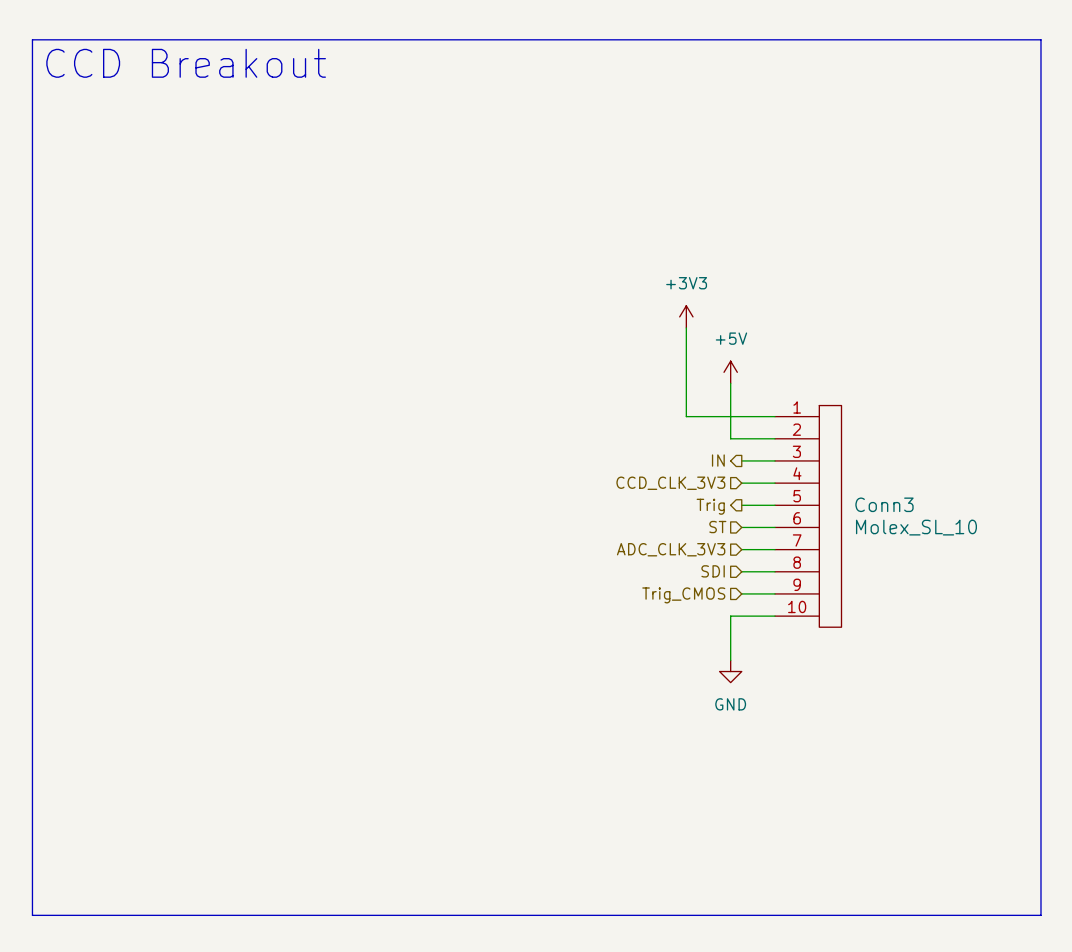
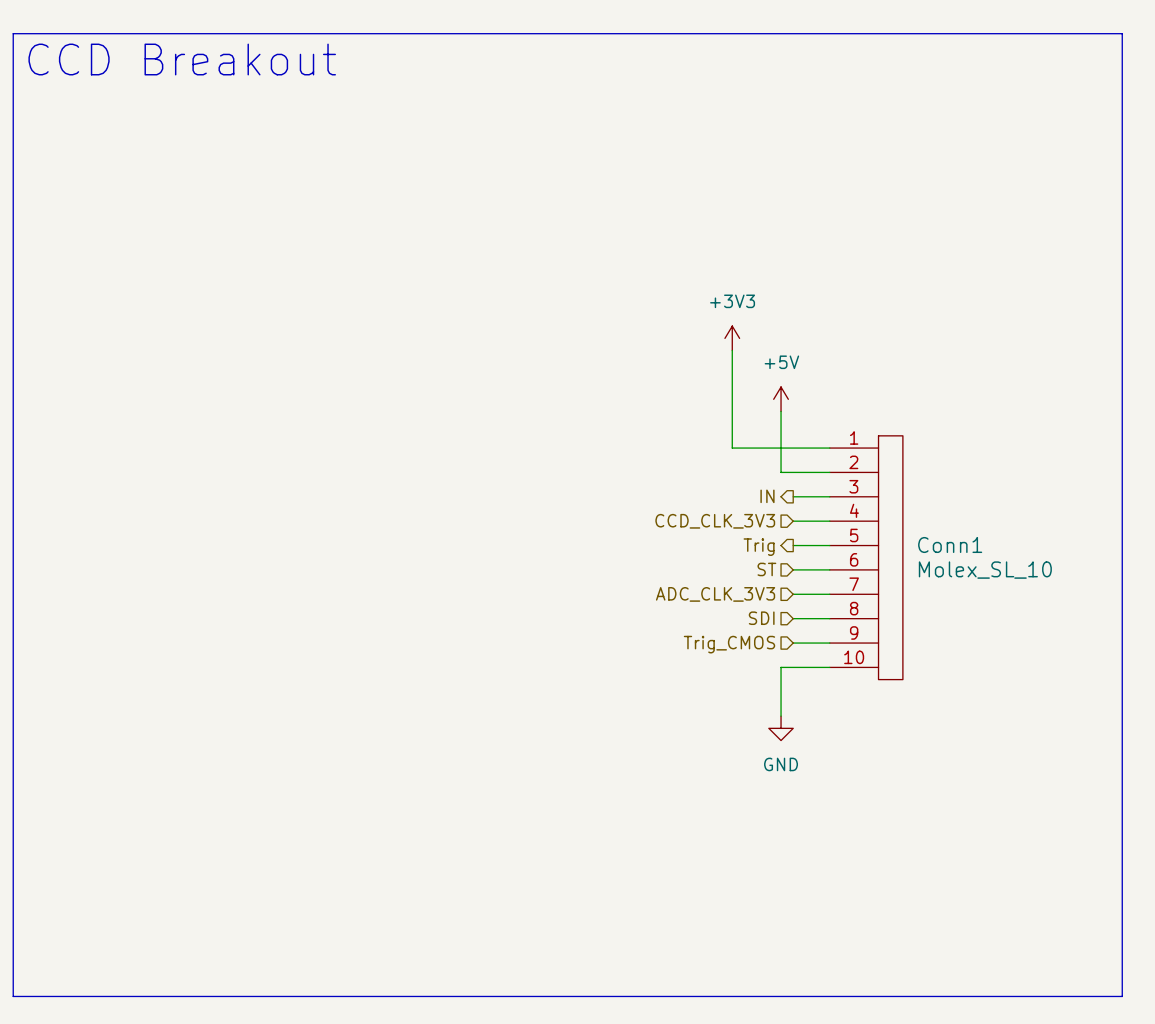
Conn3 name: Conn3 (884, 504) -> Conn1 (950, 544)

